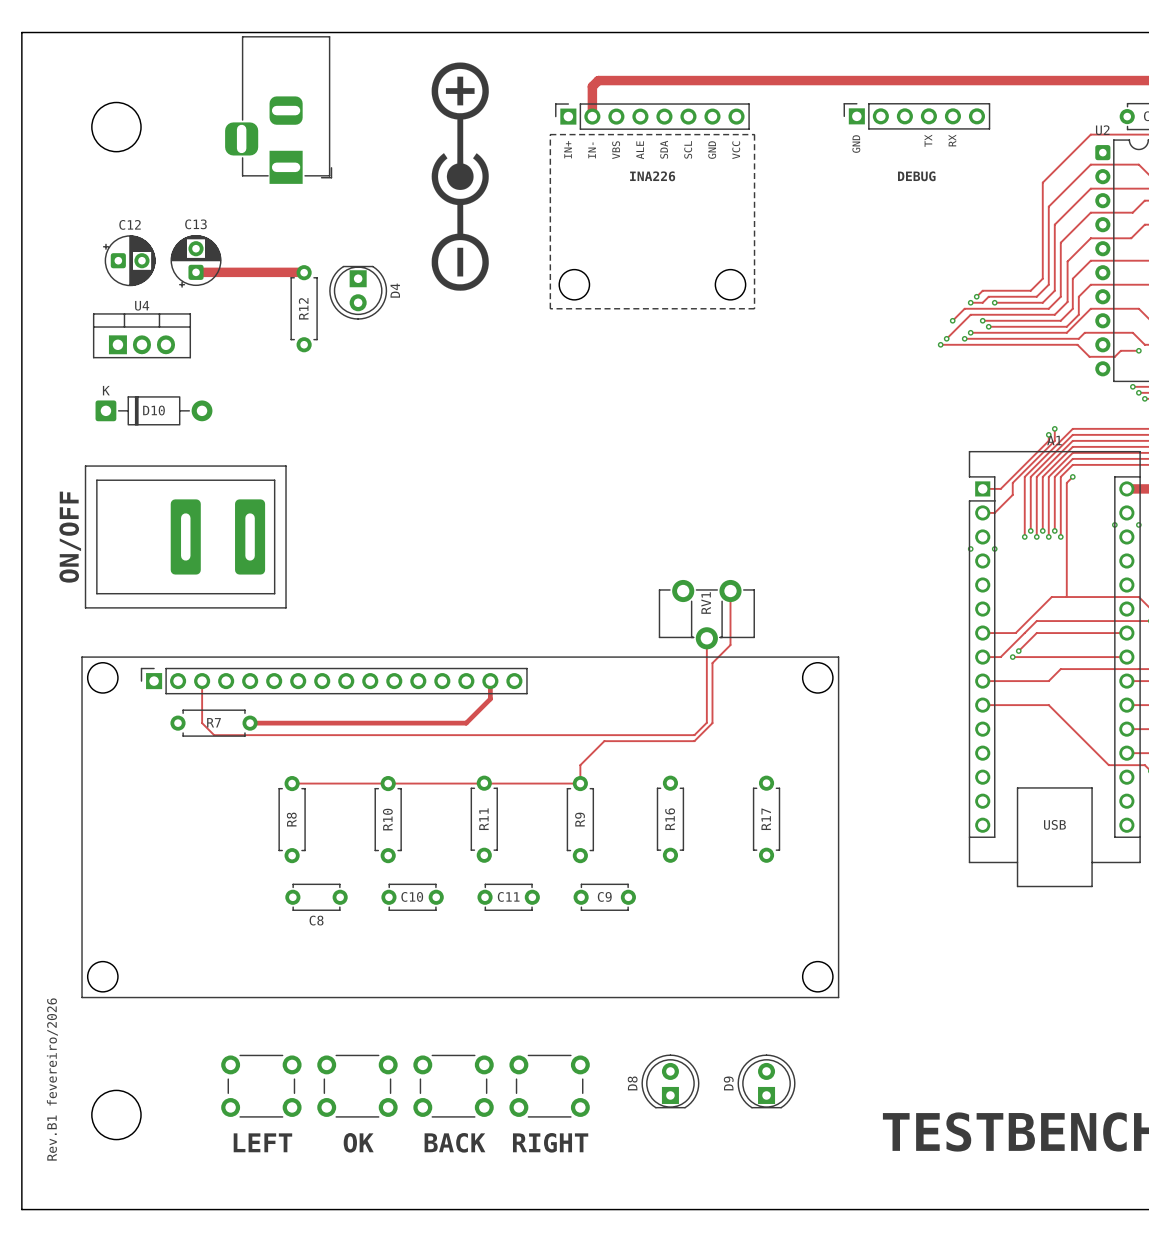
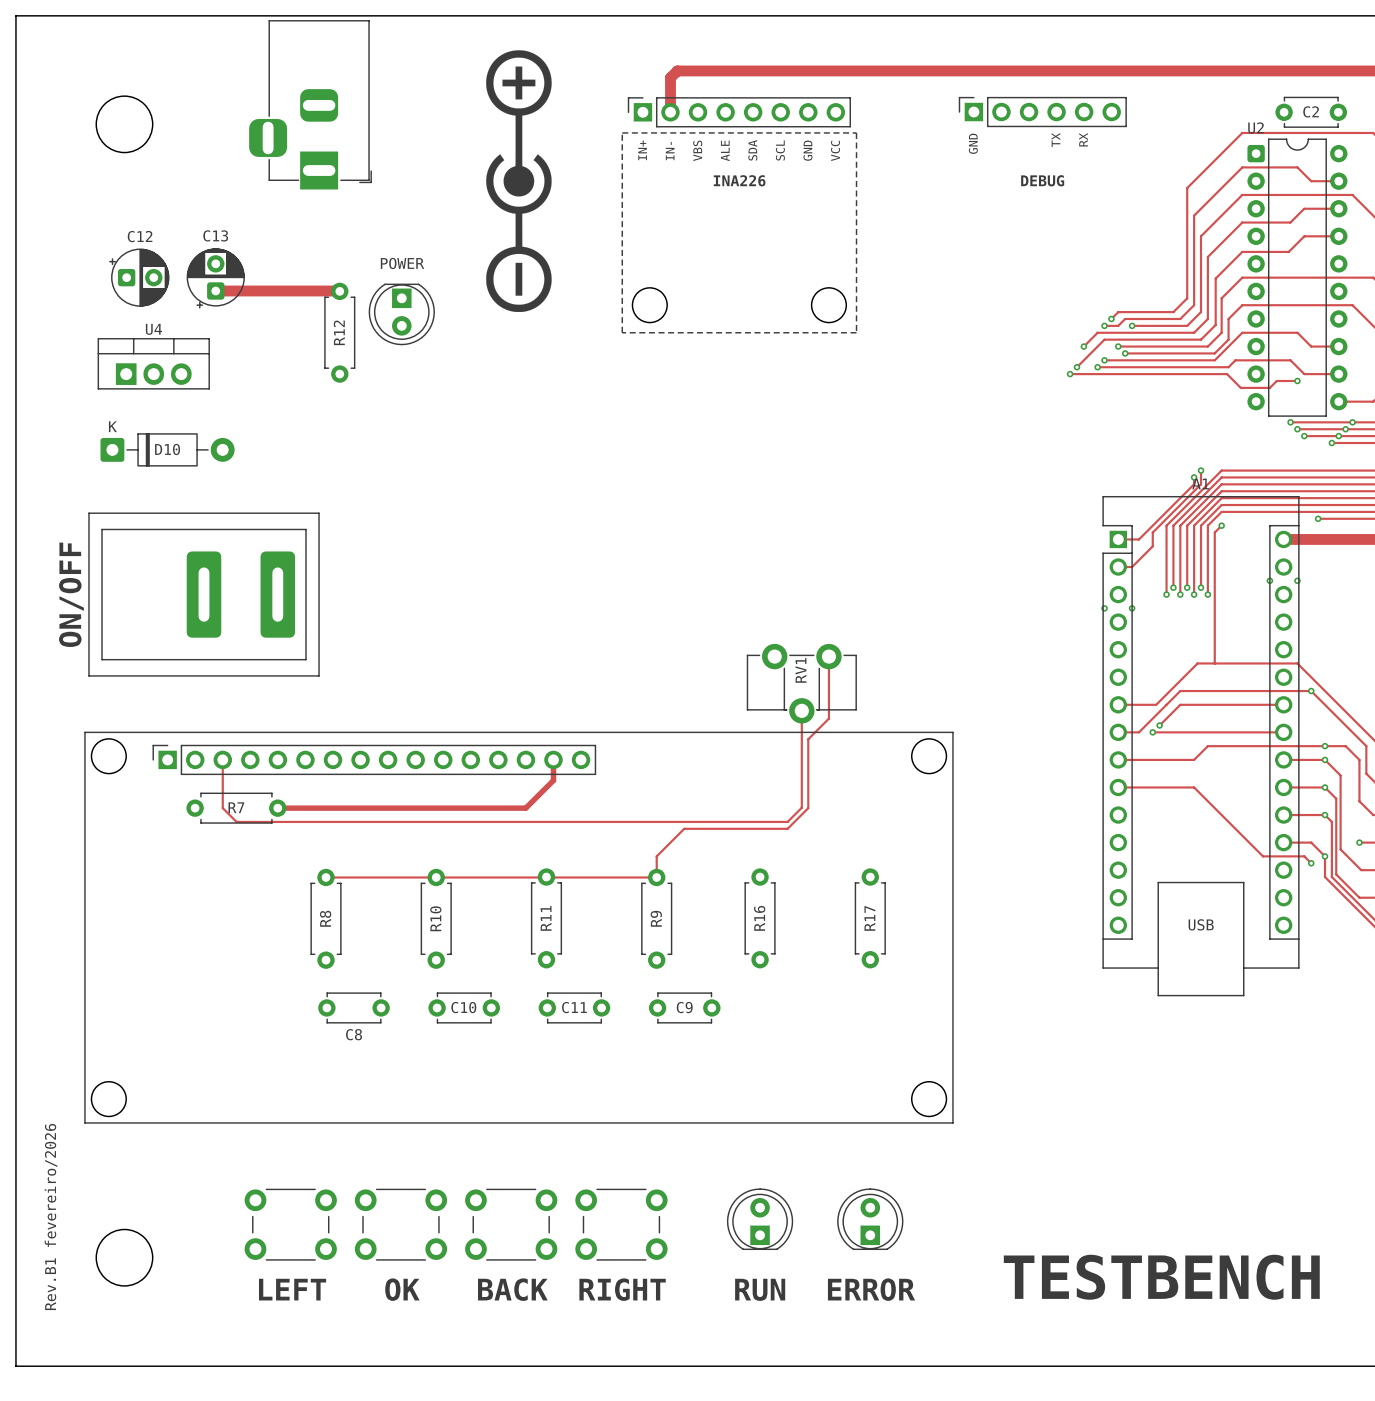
D4 value: none -> POWER (402, 263)
D4 name: D4 (395, 290) -> none
D8 name: D8 (632, 1083) -> none
D9 name: D9 (728, 1083) -> none
D8 value: none -> RUN (760, 1289)
D9 value: none -> ERROR (871, 1289)

